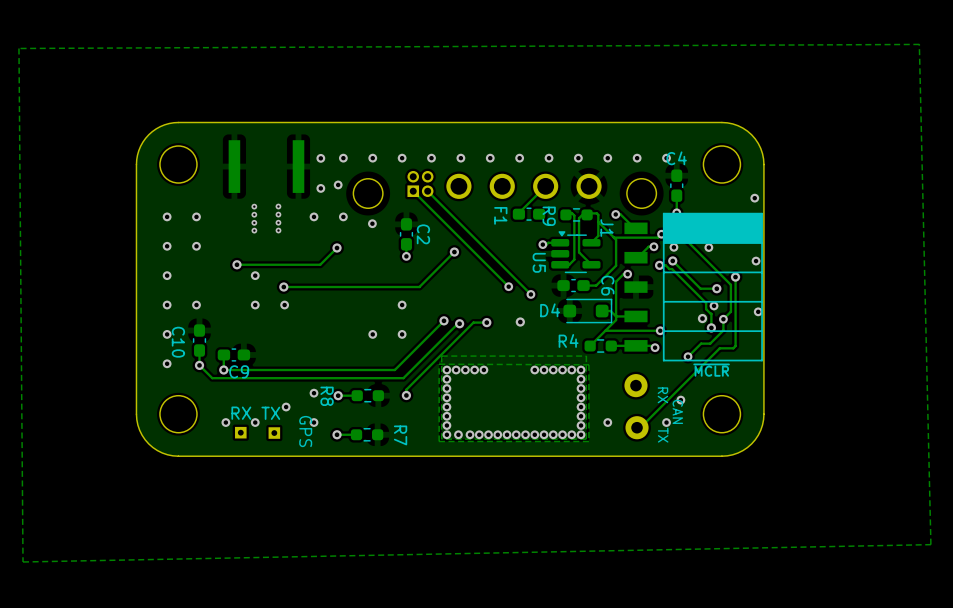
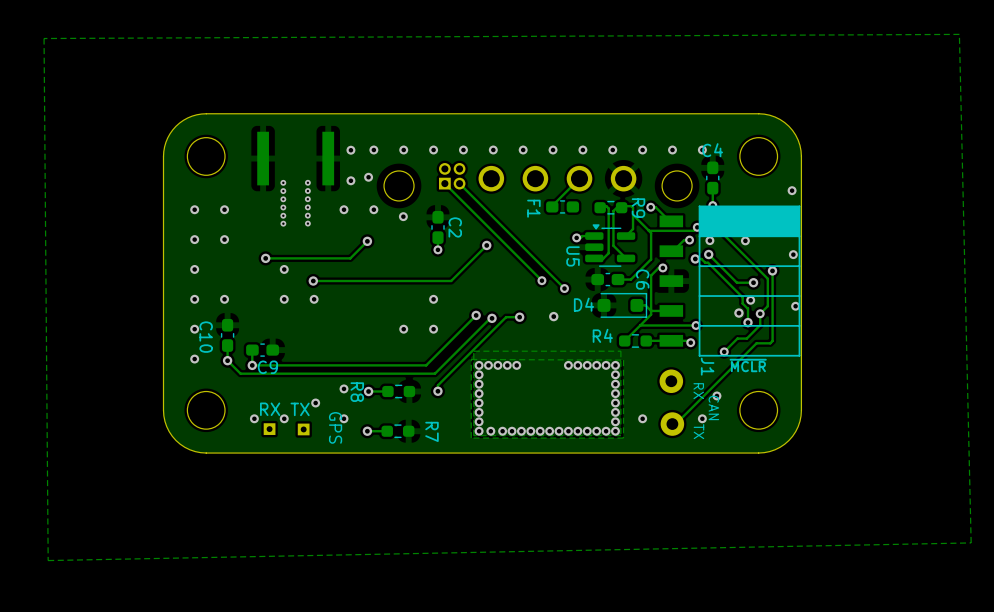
via: none -> (283, 182)
via: none -> (307, 182)
via: none -> (283, 191)
via: none -> (307, 191)
R9 name position: R9 (549, 216) -> R9 (638, 208)
J1 name position: J1 (607, 228) -> J1 (707, 366)

